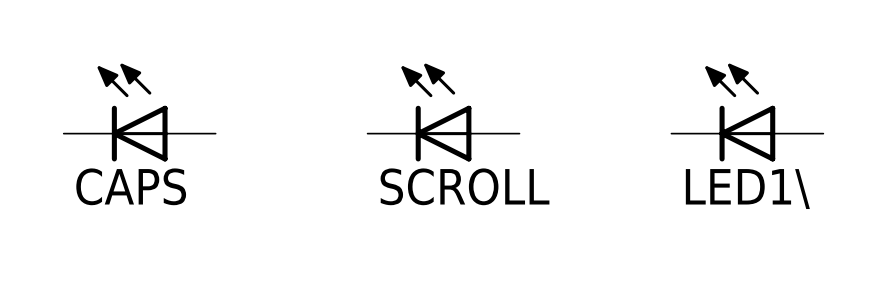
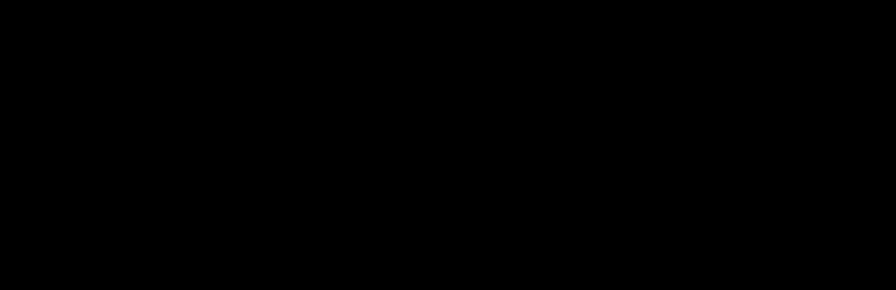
CAPS: (139, 112) -> none
SCROLL: (443, 112) -> none
LED1\: (747, 112) -> none

